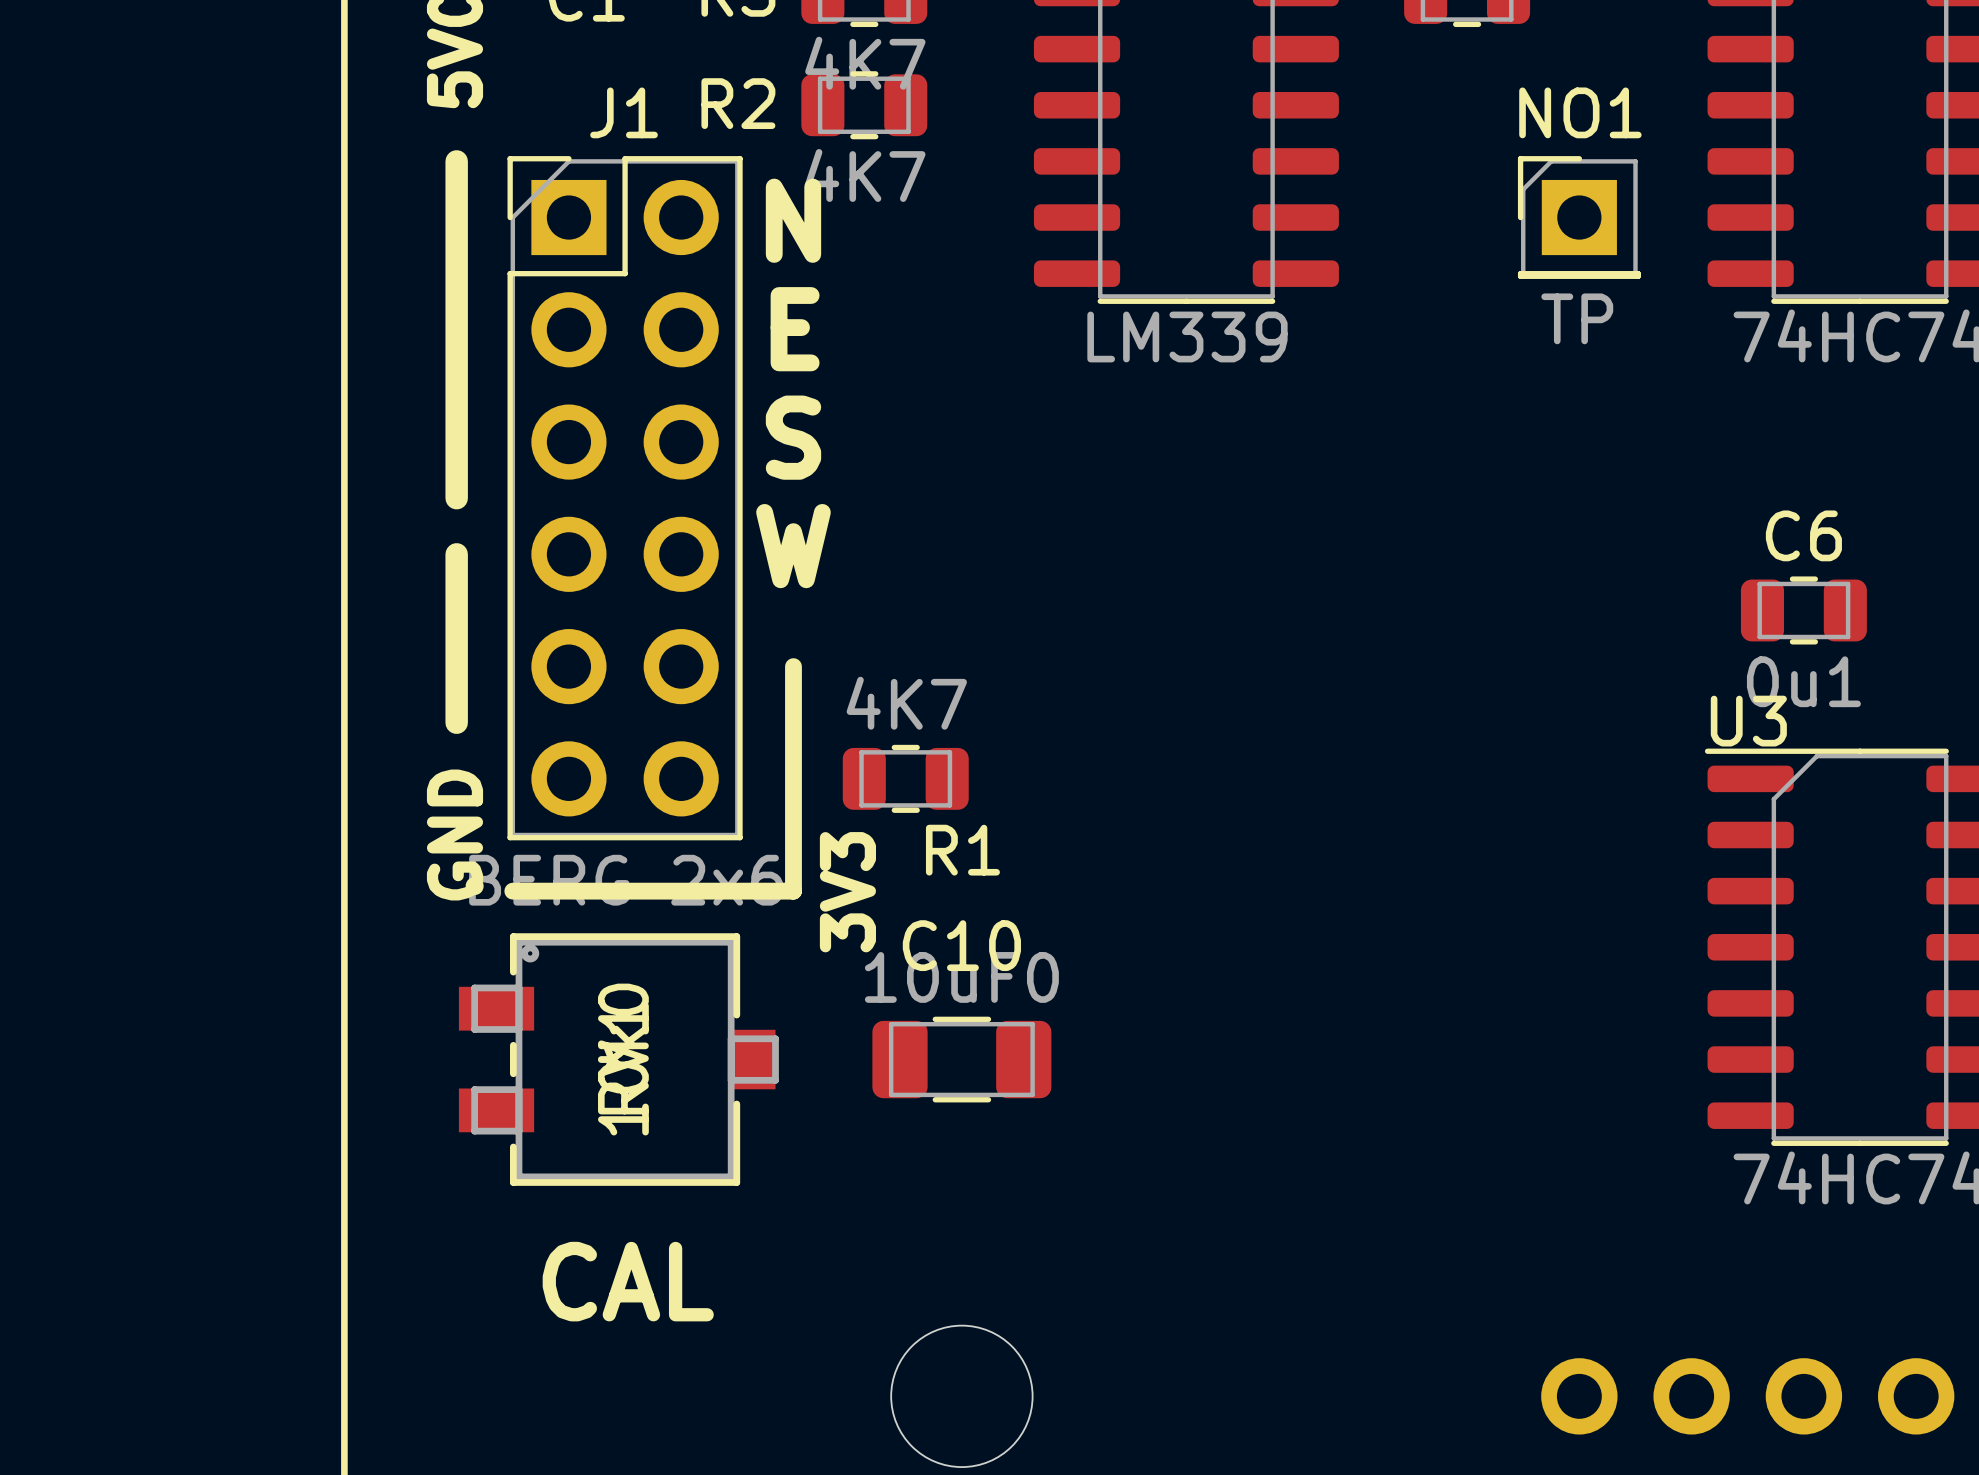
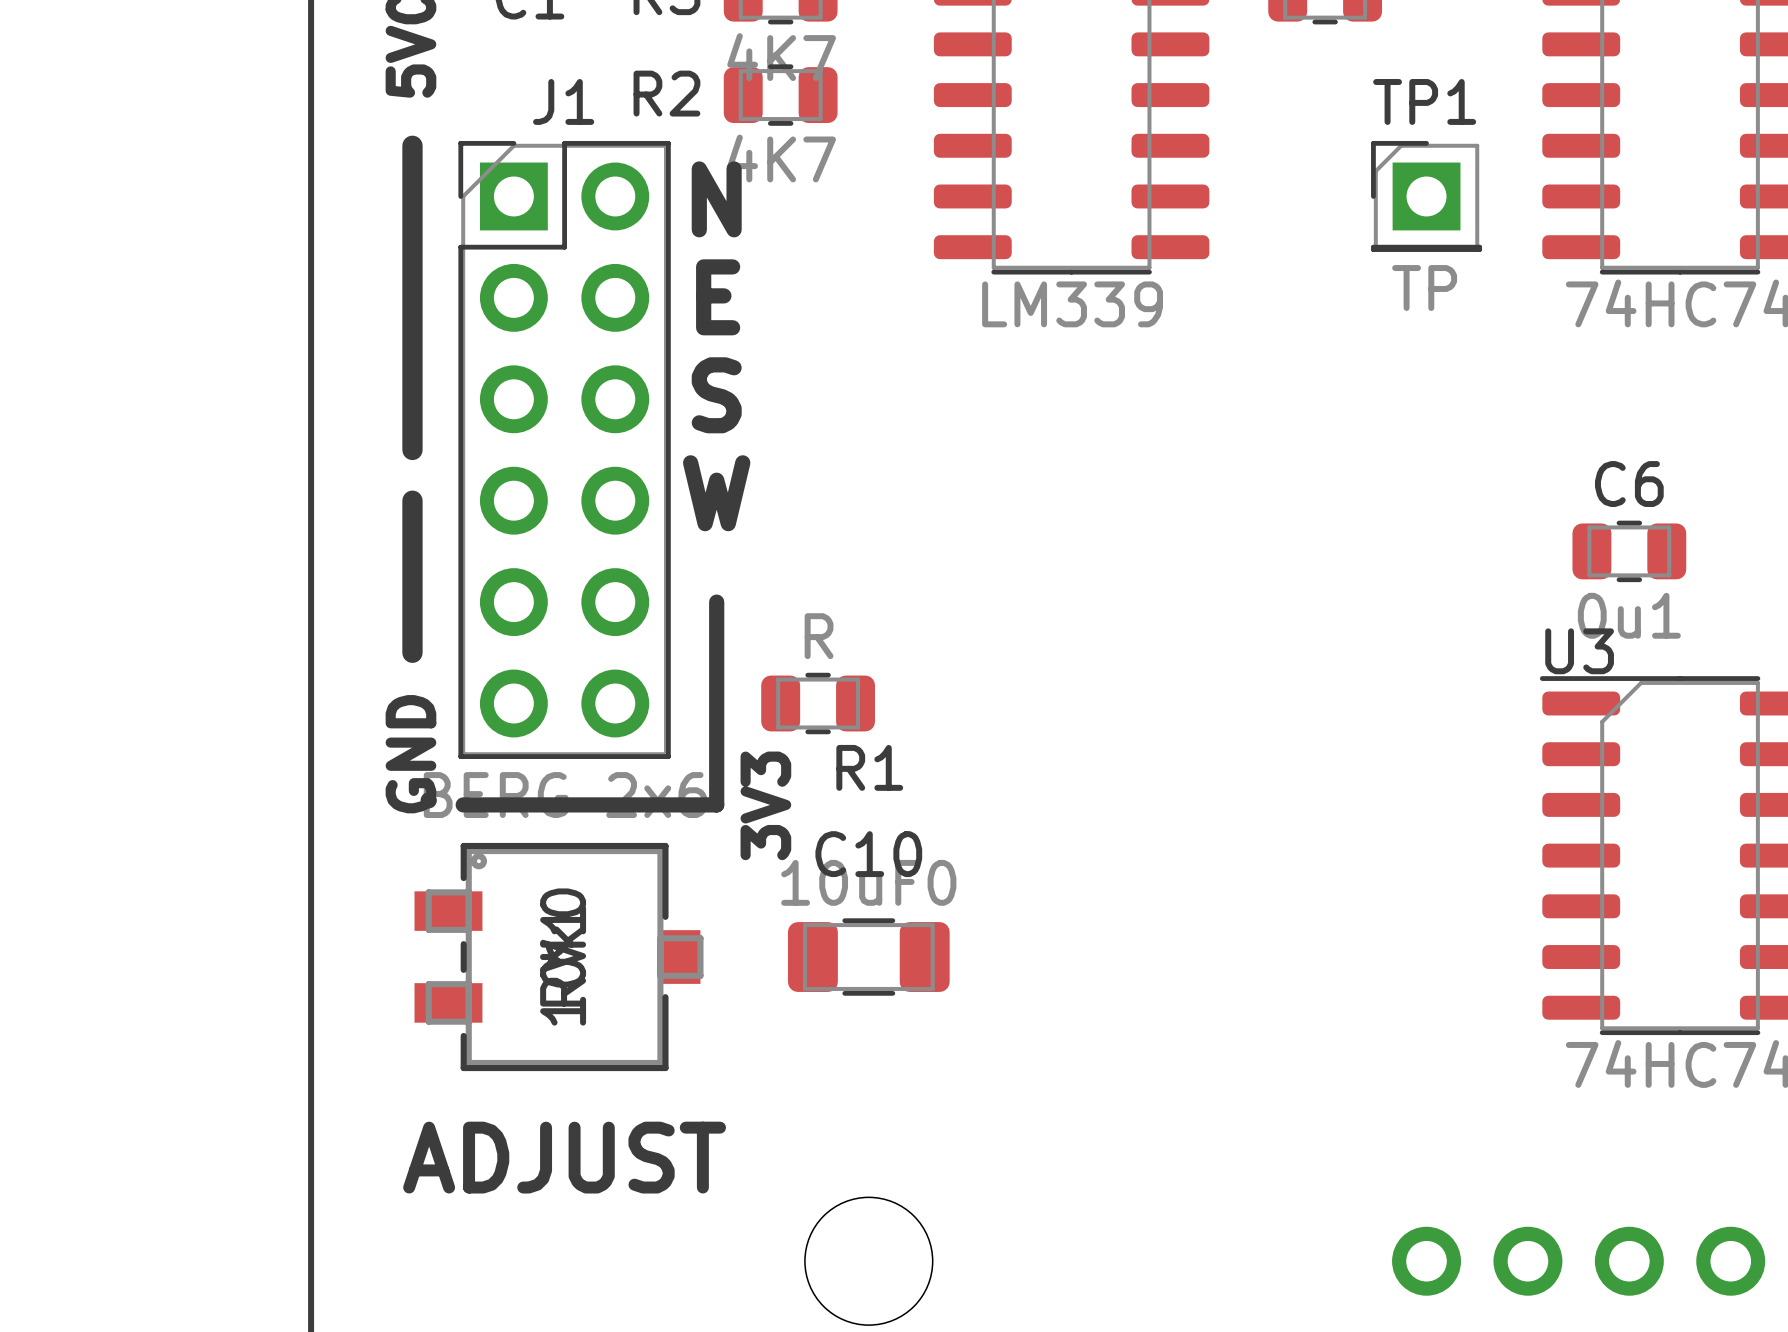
NO1 name: NO1 (1580, 112) -> TP1 (1424, 101)
R1 value: 4K7 (906, 703) -> R (819, 636)
text: CAL (628, 1281) -> ADJUST (564, 1157)

